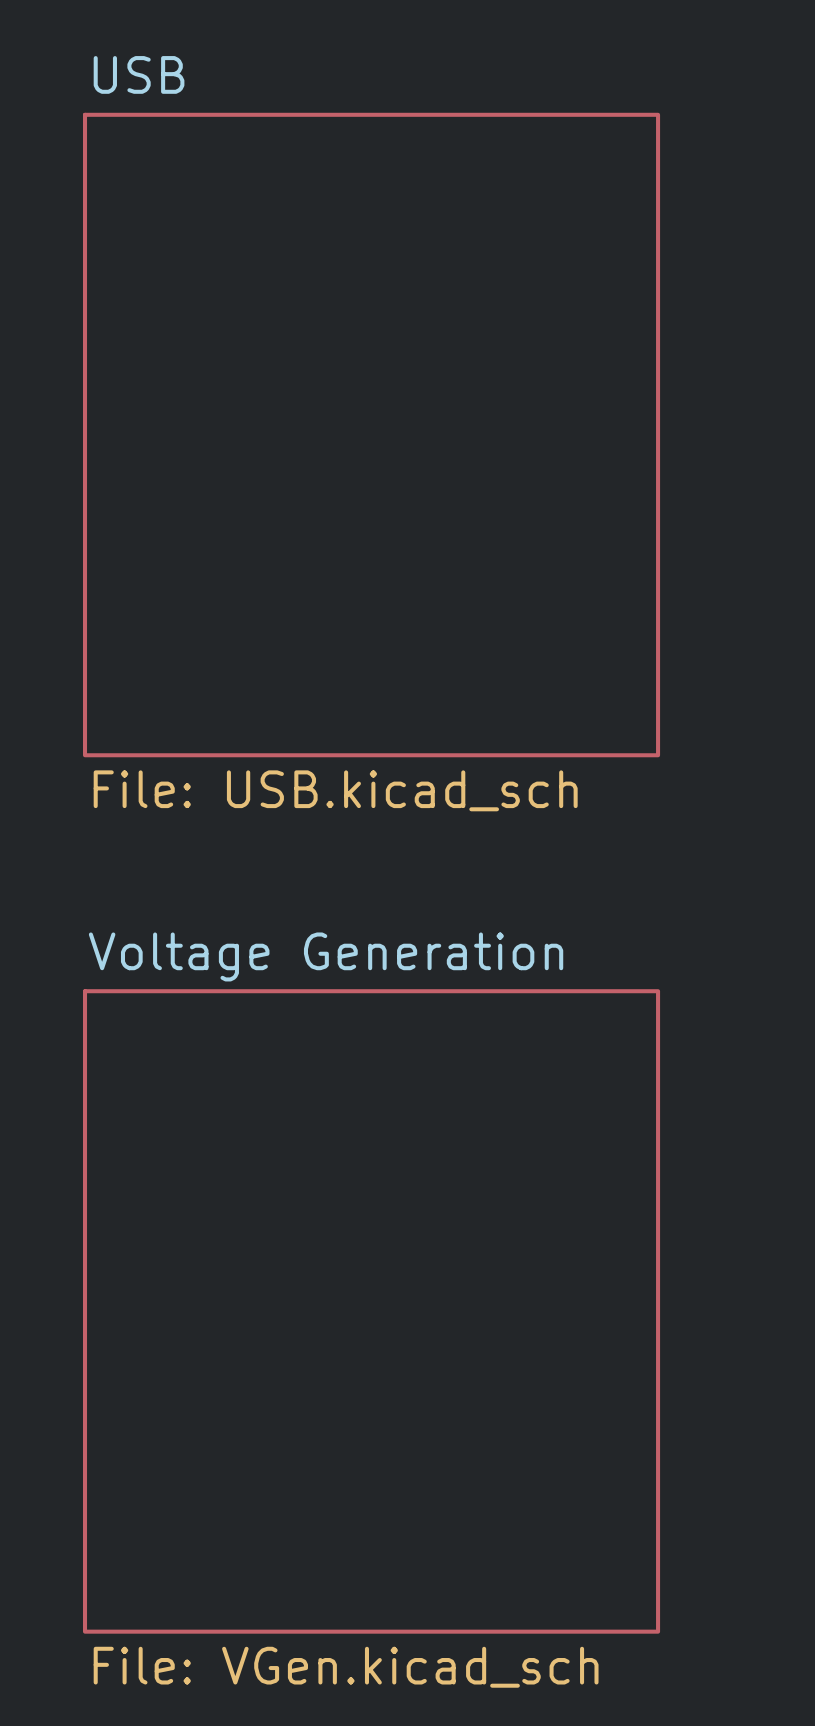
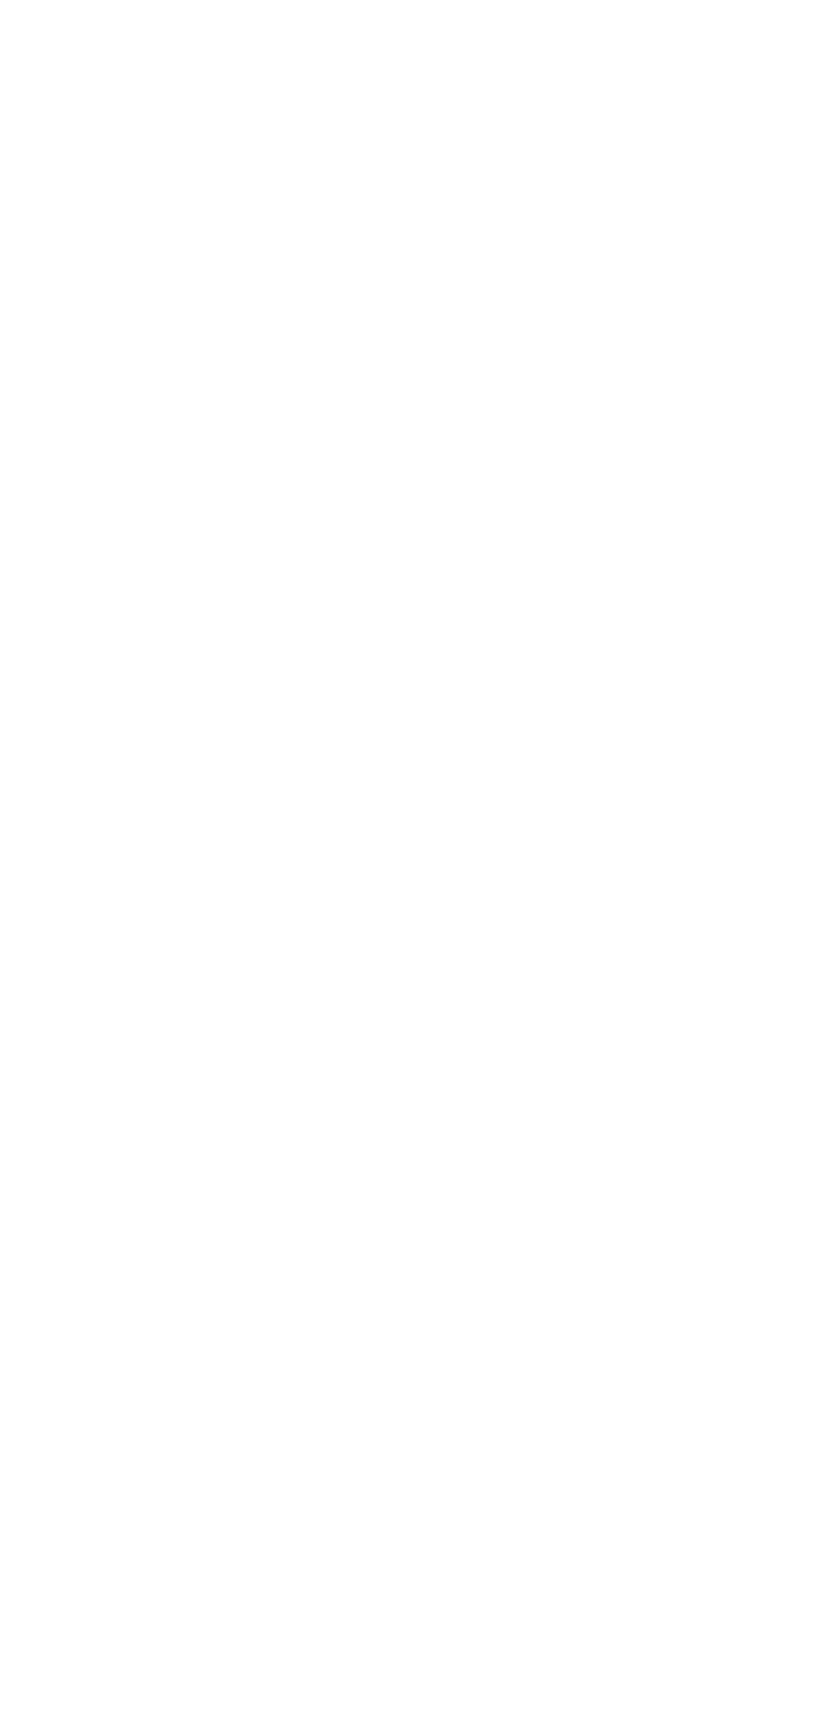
sheet USB: File: USB.kicad_sch (371, 435) -> none
sheet Voltage Generation: File: VGen.kicad_sch (371, 1311) -> none

